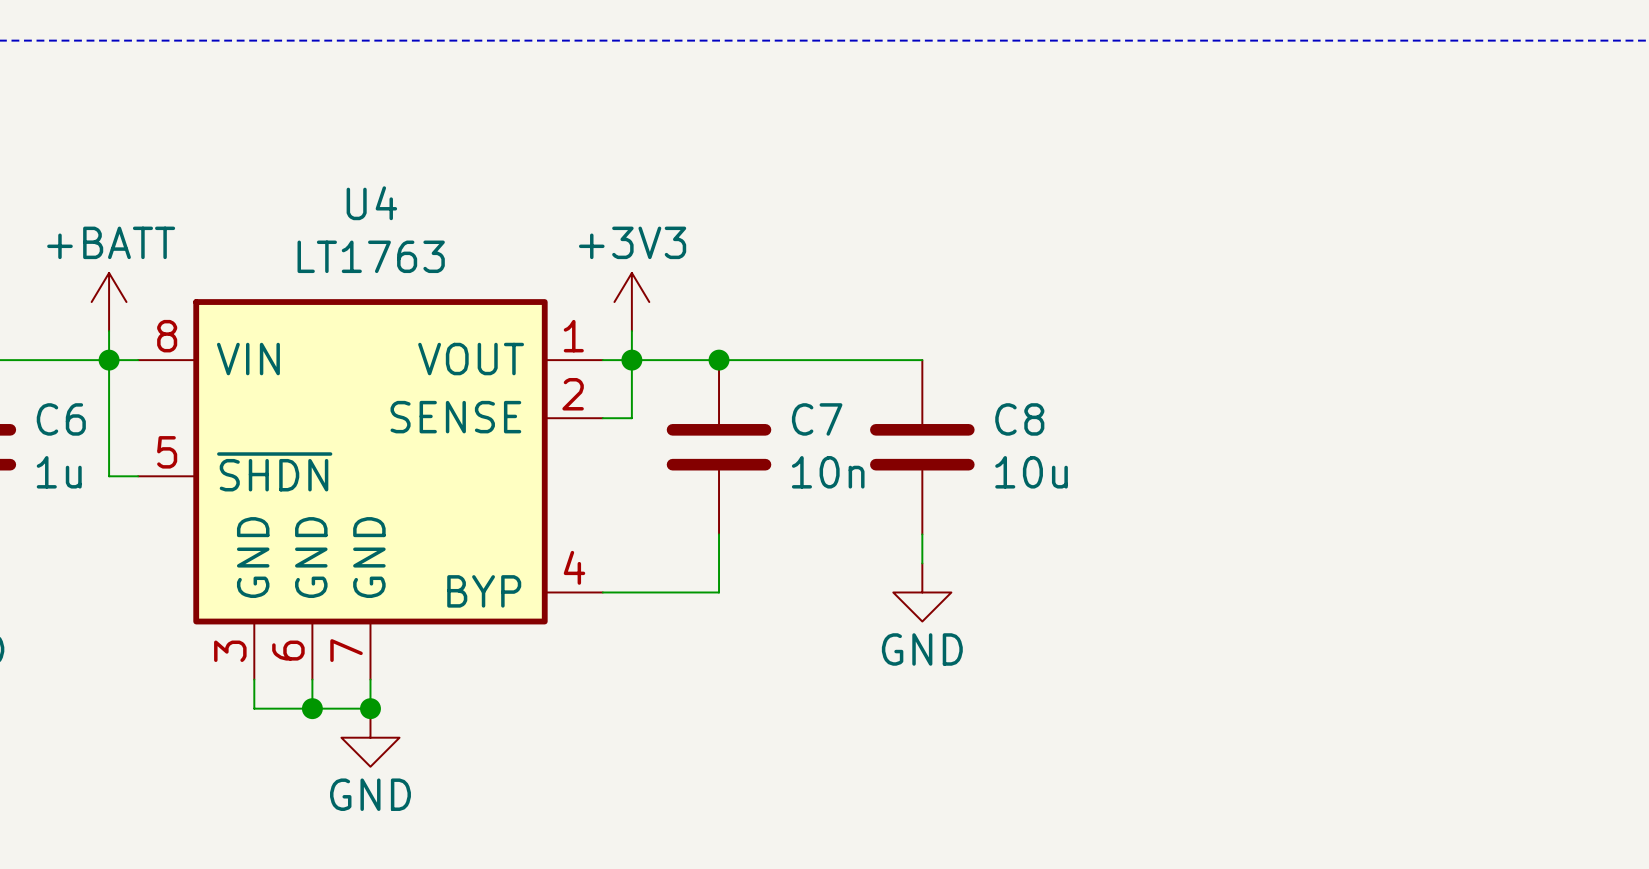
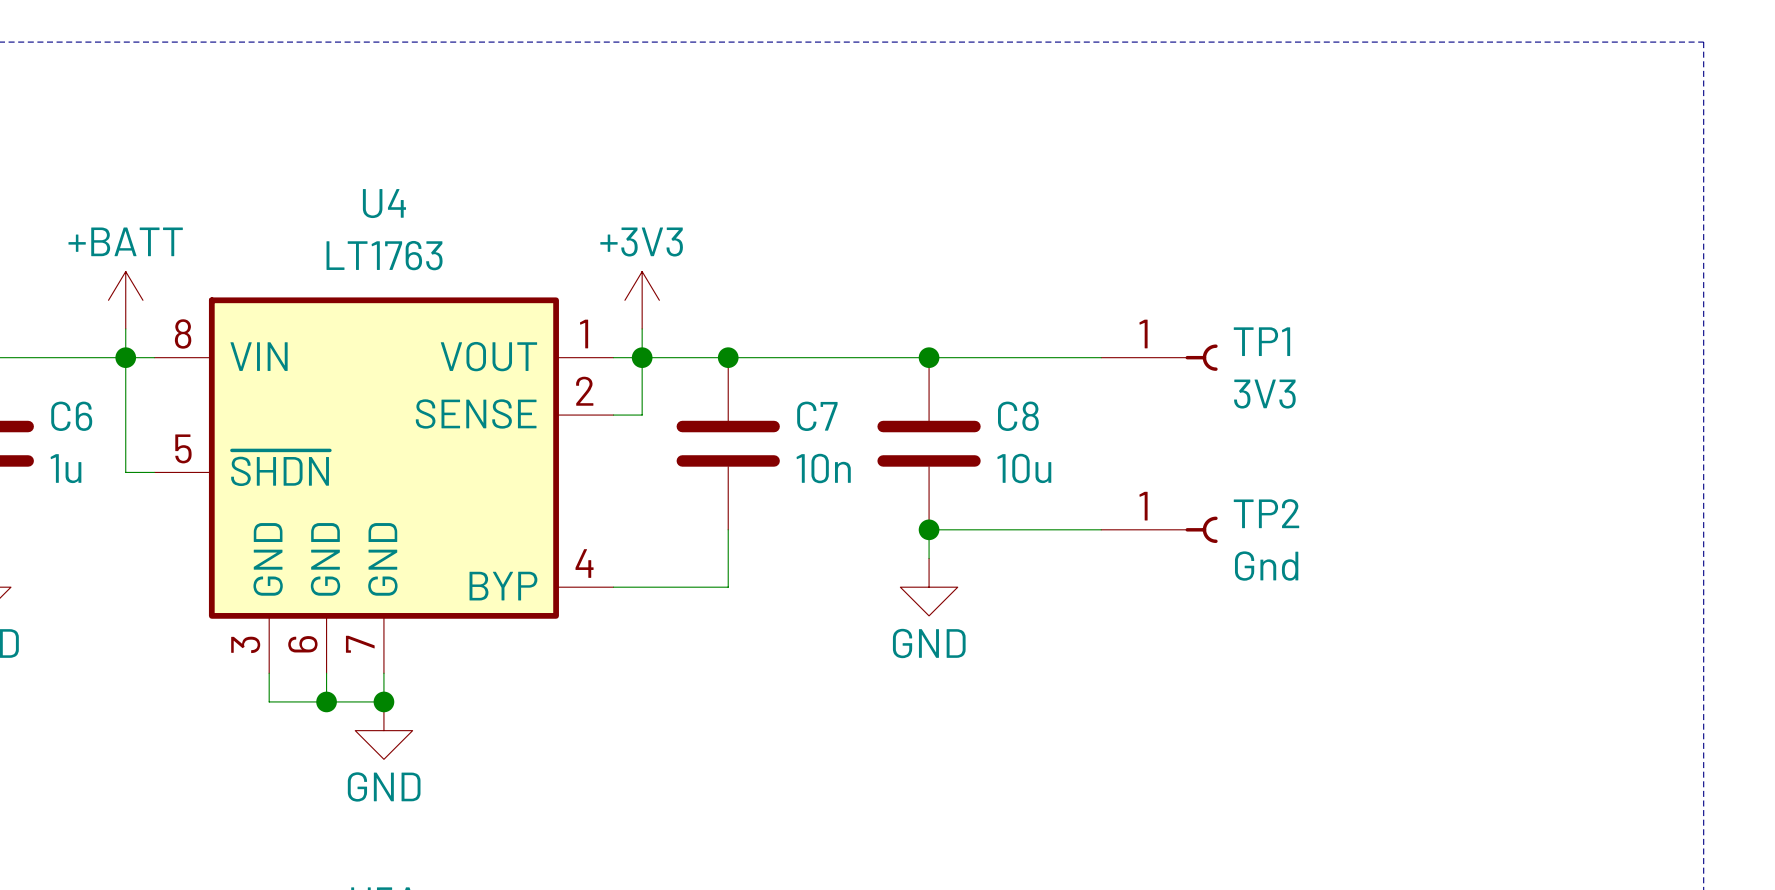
wire: none -> (929, 357) (1101, 357)
junction: none -> (929, 357)
TP1: none -> 3V3 (1159, 357)
wire: none -> (929, 529) (1101, 529)
junction: none -> (929, 529)
TP2: none -> Gnd (1159, 529)

